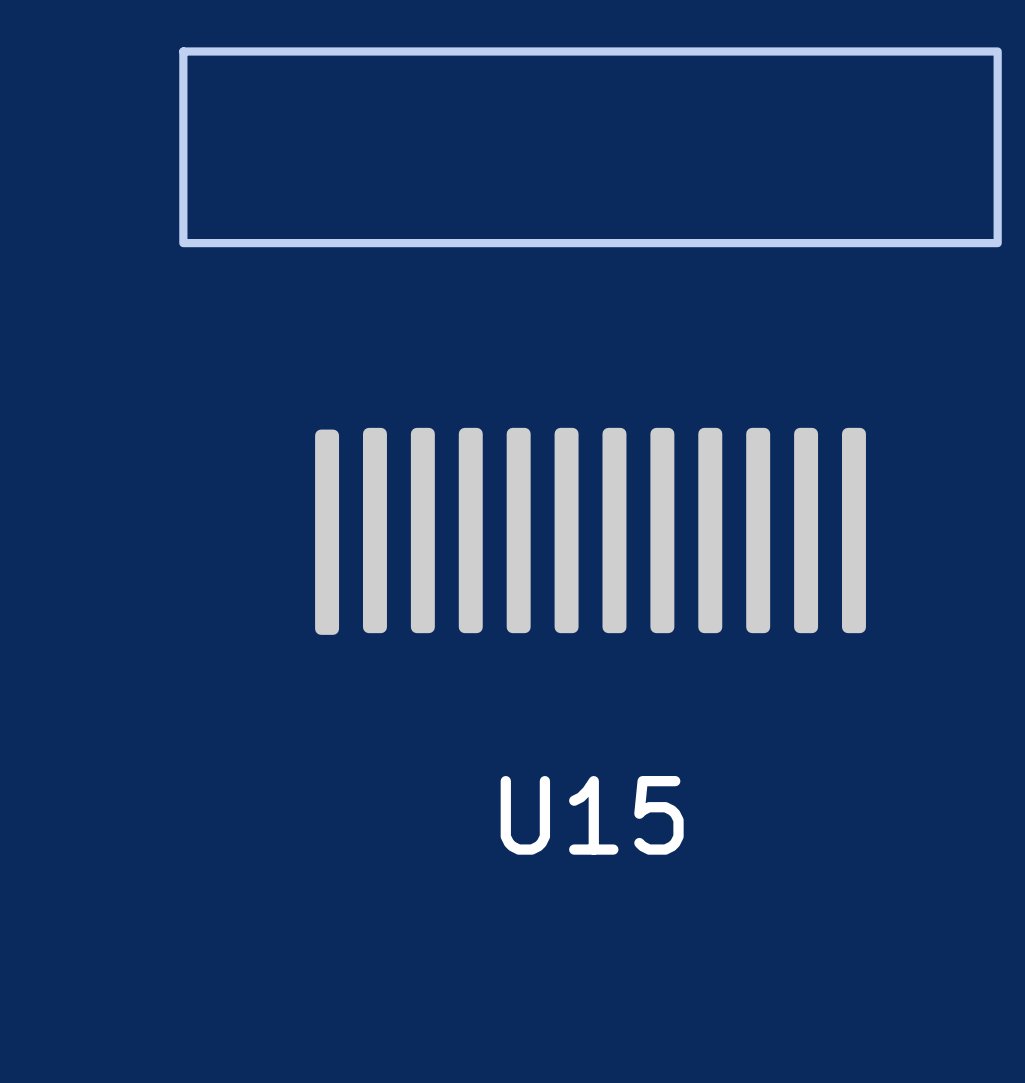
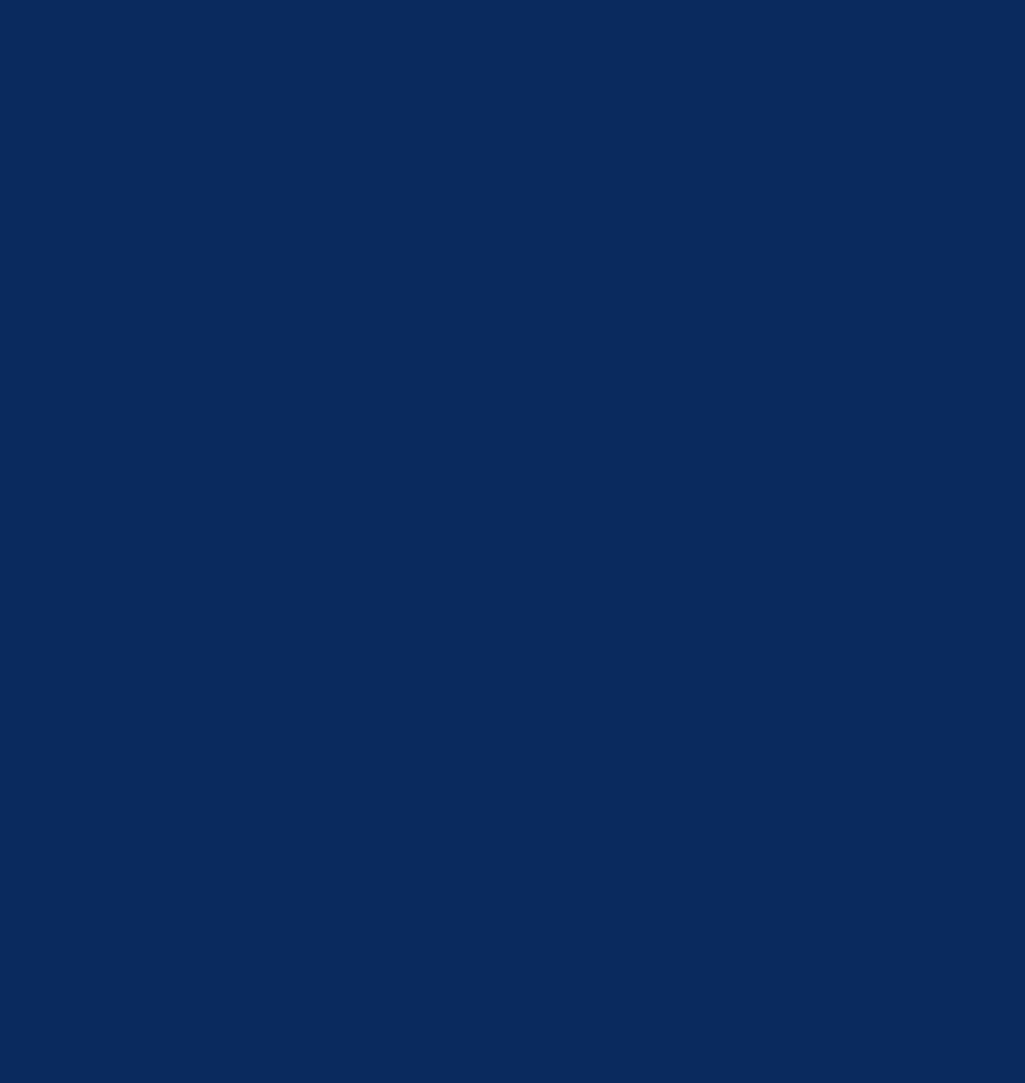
U15: (590, 341) -> none

